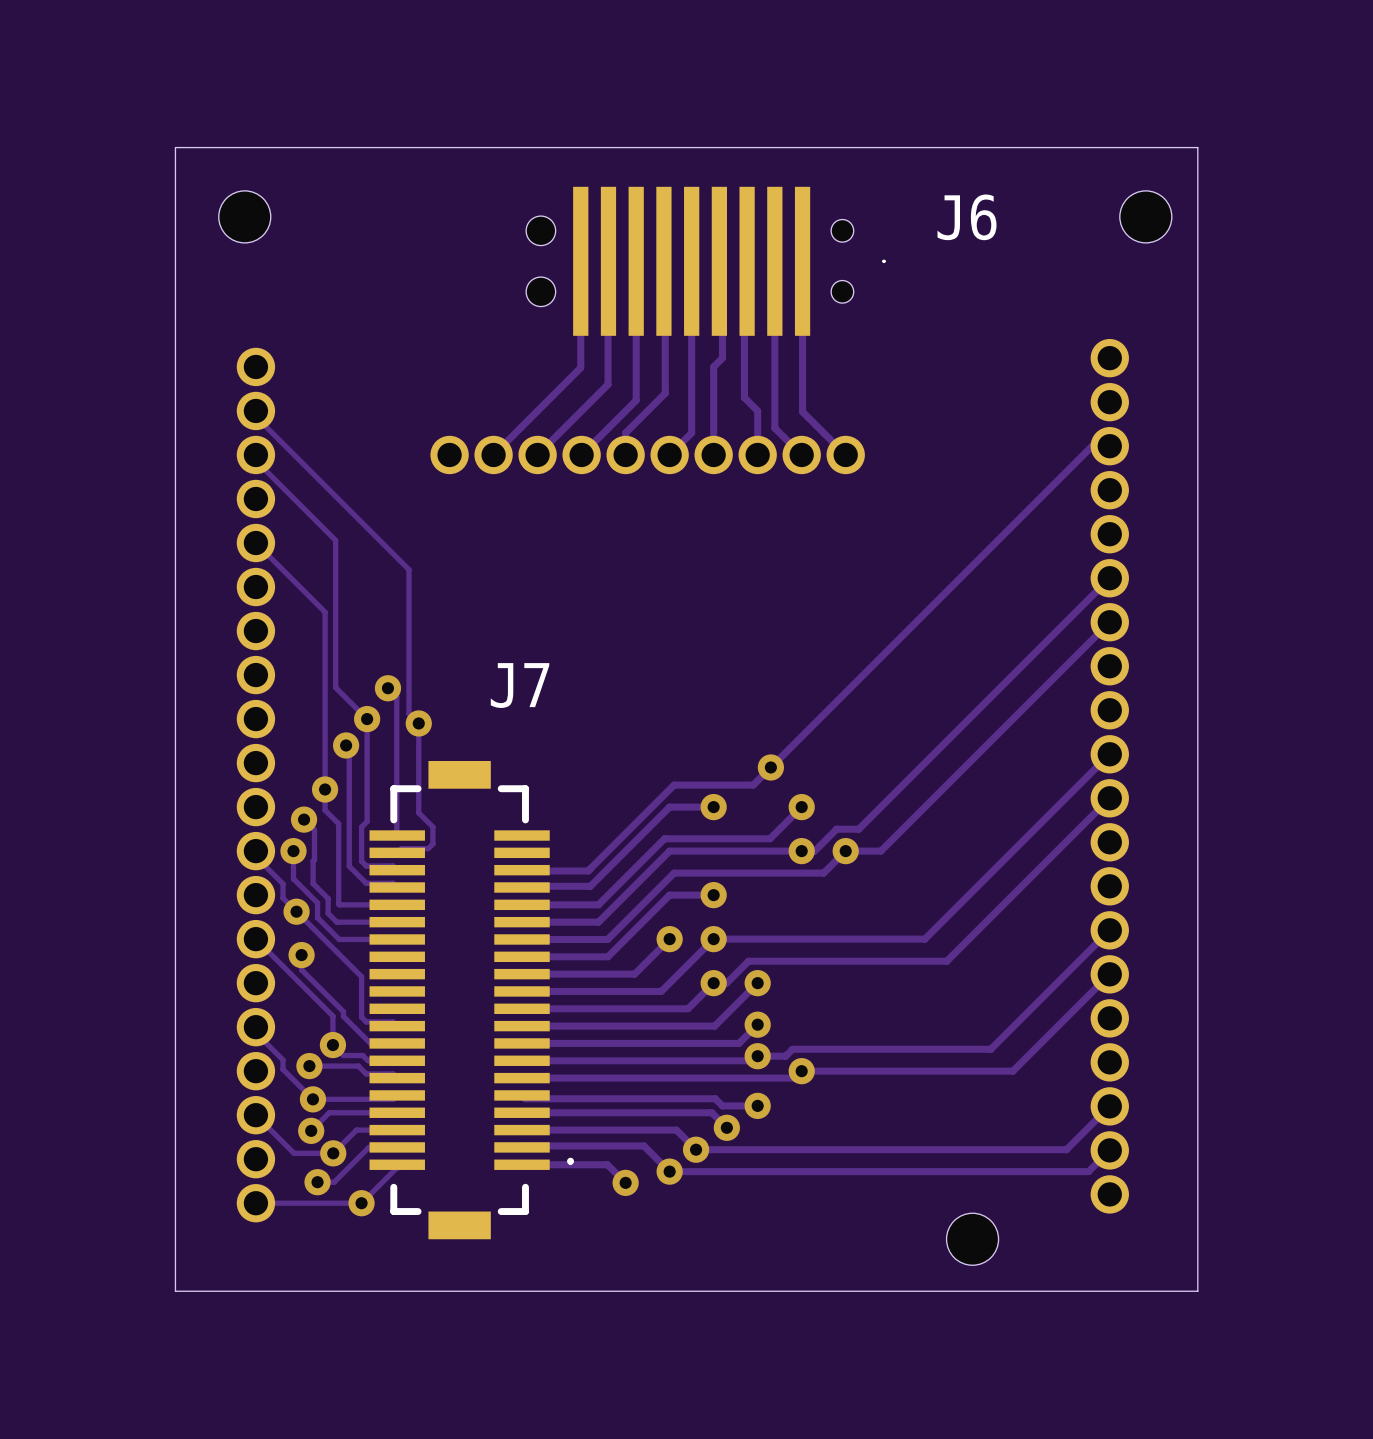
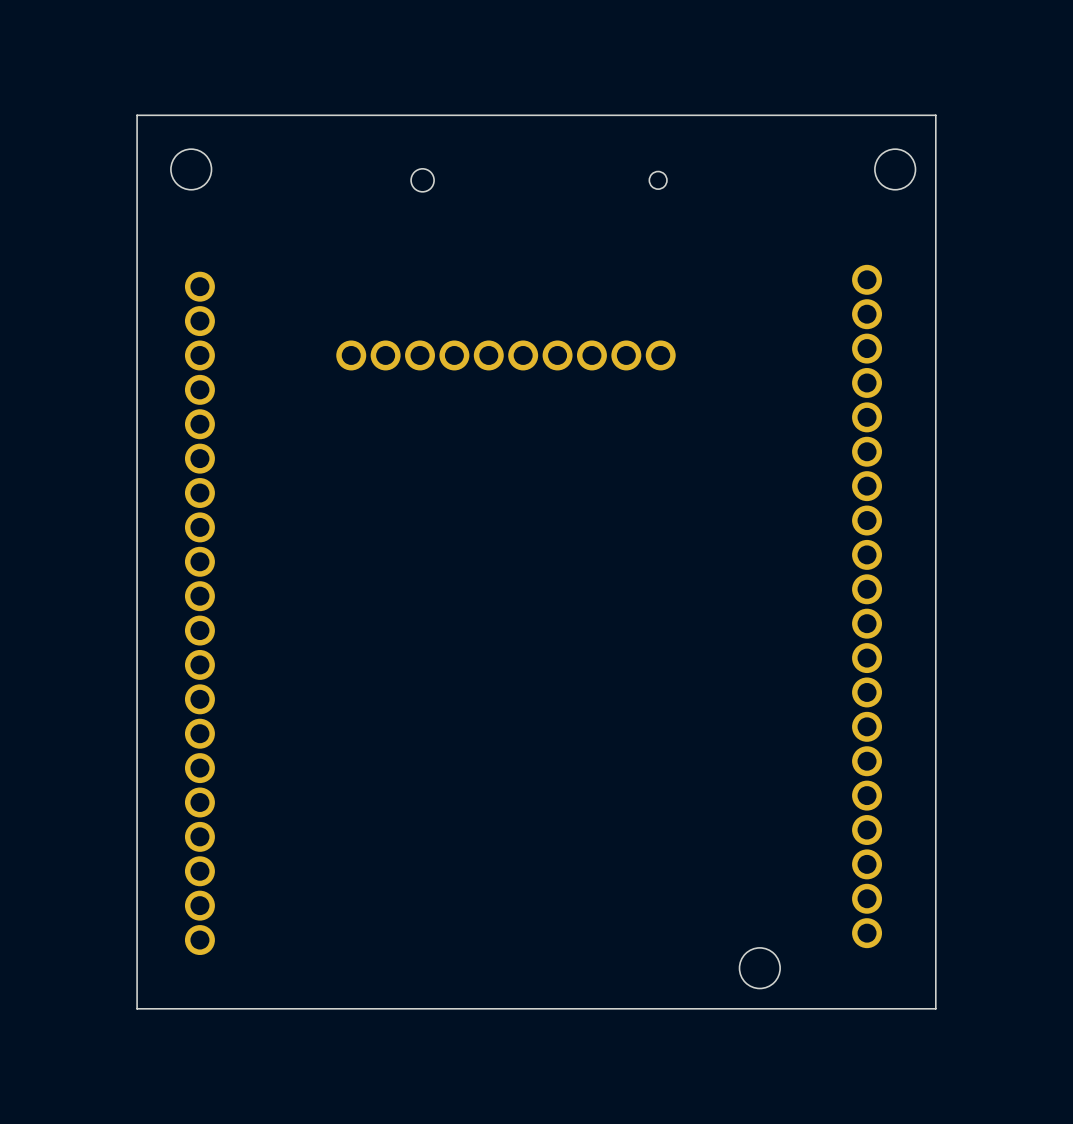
track: (580, 261) (580, 367) (493, 454) -> none
track: (608, 261) (608, 384) (537, 454) -> none
track: (636, 261) (636, 400) (581, 454) -> none
track: (663, 261) (665, 393) (625, 432) (625, 454) -> none
track: (691, 261) (691, 432) (669, 454) -> none
J6: (705, 261) -> none
track: (719, 261) (722, 264) (722, 358) (713, 366) (713, 454) -> none
track: (747, 261) (744, 263) (744, 397) (757, 410) (757, 454) -> none
track: (774, 261) (774, 428) (801, 454) -> none
track: (802, 261) (802, 411) (845, 454) -> none
track: (255, 410) (255, 416) (408, 569) (408, 713) (418, 723) (418, 812) (432, 827) (432, 843) (428, 848) (401, 848) (397, 852) -> none
track: (1109, 446) (1092, 446) (753, 785) (674, 785) (588, 871) (522, 870) -> none
track: (255, 454) (255, 460) (335, 540) (335, 687) (367, 719) (367, 821) (361, 827) (361, 861) (366, 865) (393, 865) (397, 870) -> none
track: (255, 543) (325, 612) (325, 810) (338, 823) (338, 903) (397, 904) -> none
track: (1109, 578) (858, 829) (836, 829) (814, 851) (669, 851) (598, 922) (522, 922) -> none
track: (1109, 622) (880, 851) (845, 851) (823, 873) (674, 873) (607, 939) (522, 939) -> none
track: (387, 688) (396, 697) (396, 835) -> none
via: (387, 688) -> none
via: (367, 719) -> none
via: (418, 723) -> none
track: (346, 745) (349, 748) (349, 866) (366, 883) (393, 883) (397, 887) -> none
via: (346, 745) -> none
track: (1109, 754) (924, 939) (713, 939) (661, 991) (522, 991) -> none
via: (770, 767) -> none
via: (325, 789) -> none
track: (1109, 798) (946, 961) (748, 961) (726, 983) (713, 983) (688, 1008) (522, 1008) -> none
track: (713, 807) (669, 807) (590, 886) (522, 887) -> none
via: (713, 807) -> none
track: (801, 807) (770, 838) (664, 838) (598, 904) (522, 904) -> none
via: (801, 807) -> none
track: (304, 819) (314, 830) (313, 883) (328, 898) (328, 913) (336, 922) (397, 922) -> none
via: (304, 819) -> none
track: (255, 851) (255, 856) (283, 883) (283, 898) (361, 976) (361, 1017) (366, 1021) (393, 1021) (397, 1026) -> none
track: (293, 851) (293, 878) (317, 902) (317, 917) (339, 939) (397, 939) -> none
via: (293, 851) -> none
via: (801, 851) -> none
via: (845, 851) -> none
track: (713, 895) (669, 895) (607, 956) (522, 956) -> none
via: (713, 895) -> none
via: (296, 911) -> none
track: (1109, 930) (990, 1049) (792, 1049) (785, 1056) (757, 1056) (753, 1060) (522, 1060) -> none
track: (255, 939) (332, 1016) (332, 1045) (343, 1055) (362, 1055) (368, 1060) (397, 1060) -> none
track: (669, 939) (634, 974) (522, 974) -> none
via: (669, 939) -> none
via: (713, 939) -> none
track: (301, 955) (301, 969) (343, 1011) (343, 1016) (370, 1043) (397, 1043) -> none
via: (301, 955) -> none
track: (1109, 974) (1012, 1071) (801, 1071) (794, 1078) (522, 1078) -> none
via: (713, 983) -> none
track: (757, 983) (714, 1026) (522, 1026) -> none
via: (757, 983) -> none
J7: (471, 1000) -> none
track: (757, 1024) (738, 1043) (522, 1043) -> none
via: (757, 1024) -> none
track: (255, 1027) (255, 1032) (283, 1059) (283, 1069) (312, 1099) (393, 1099) (397, 1095) -> none
via: (332, 1045) -> none
via: (757, 1056) -> none
track: (309, 1066) (358, 1066) (366, 1073) (393, 1073) (397, 1078) -> none
via: (309, 1066) -> none
via: (801, 1071) -> none
track: (522, 1095) (525, 1098) (715, 1098) (722, 1105) (757, 1105) -> none
via: (312, 1099) -> none
via: (757, 1105) -> none
track: (1109, 1106) (1066, 1149) (696, 1149) (676, 1130) (522, 1130) -> none
track: (397, 1112) (329, 1112) (311, 1130) -> none
track: (522, 1112) (711, 1112) (726, 1127) -> none
track: (255, 1115) (294, 1153) (333, 1153) (356, 1130) (397, 1130) -> none
via: (726, 1127) -> none
via: (311, 1130) -> none
track: (397, 1147) (368, 1147) (334, 1182) (317, 1182) -> none
track: (522, 1147) (644, 1146) (669, 1171) (1088, 1171) (1109, 1150) -> none
via: (696, 1149) -> none
via: (333, 1153) -> none
track: (397, 1164) (397, 1167) (361, 1203) (255, 1203) -> none
track: (522, 1164) (607, 1164) (625, 1182) -> none
via: (669, 1171) -> none
via: (317, 1182) -> none
via: (625, 1182) -> none
via: (361, 1203) -> none

